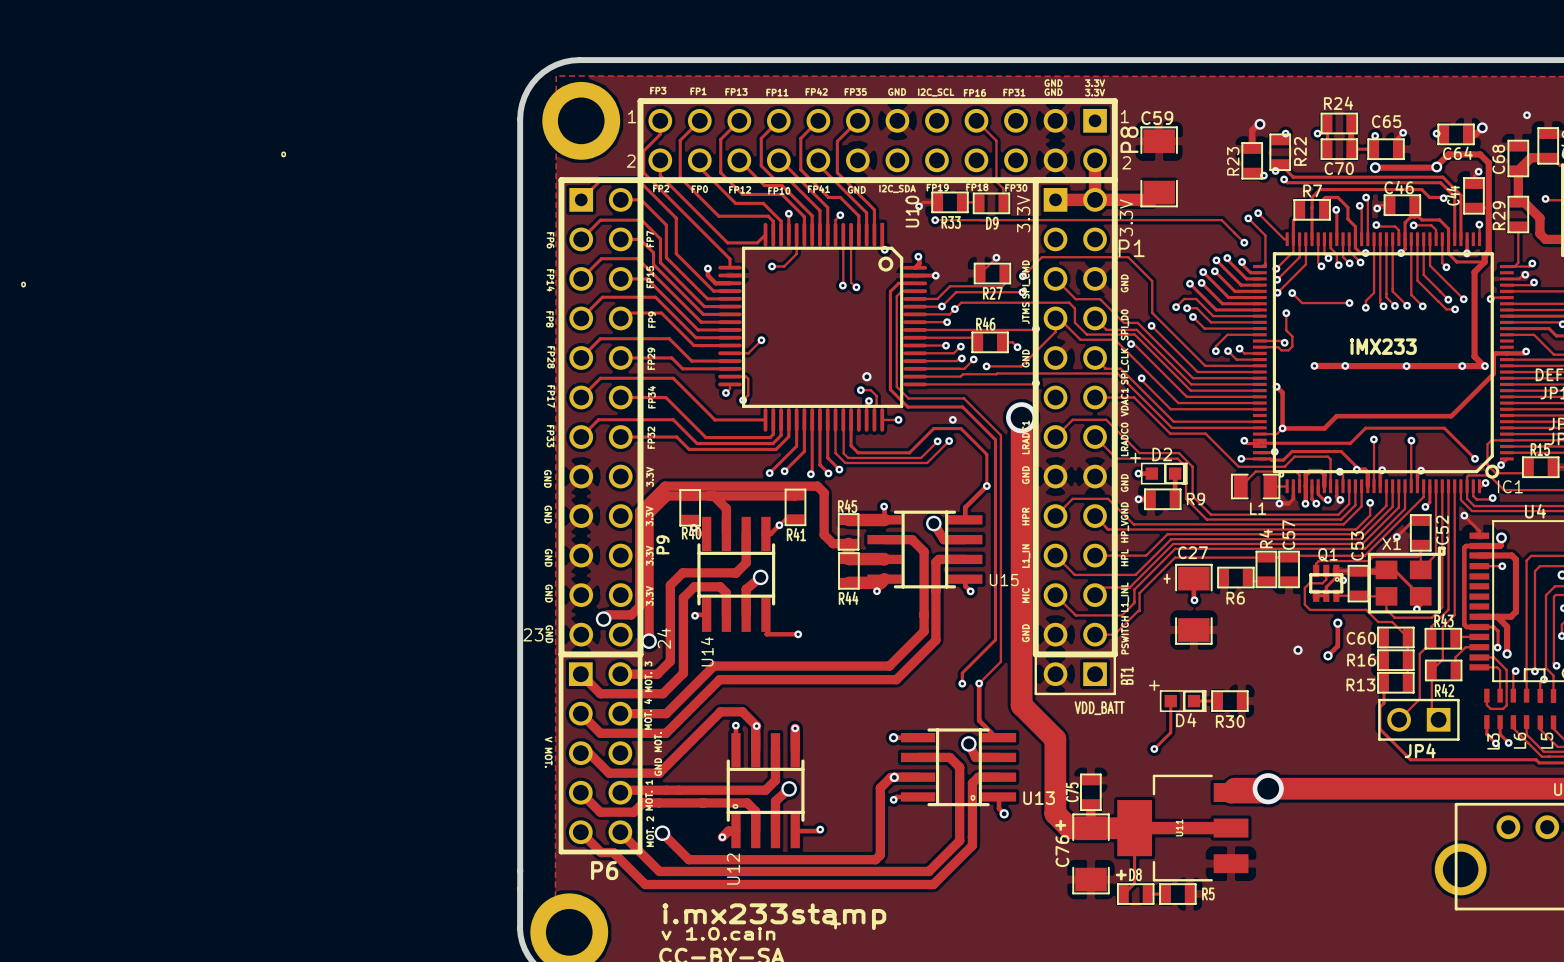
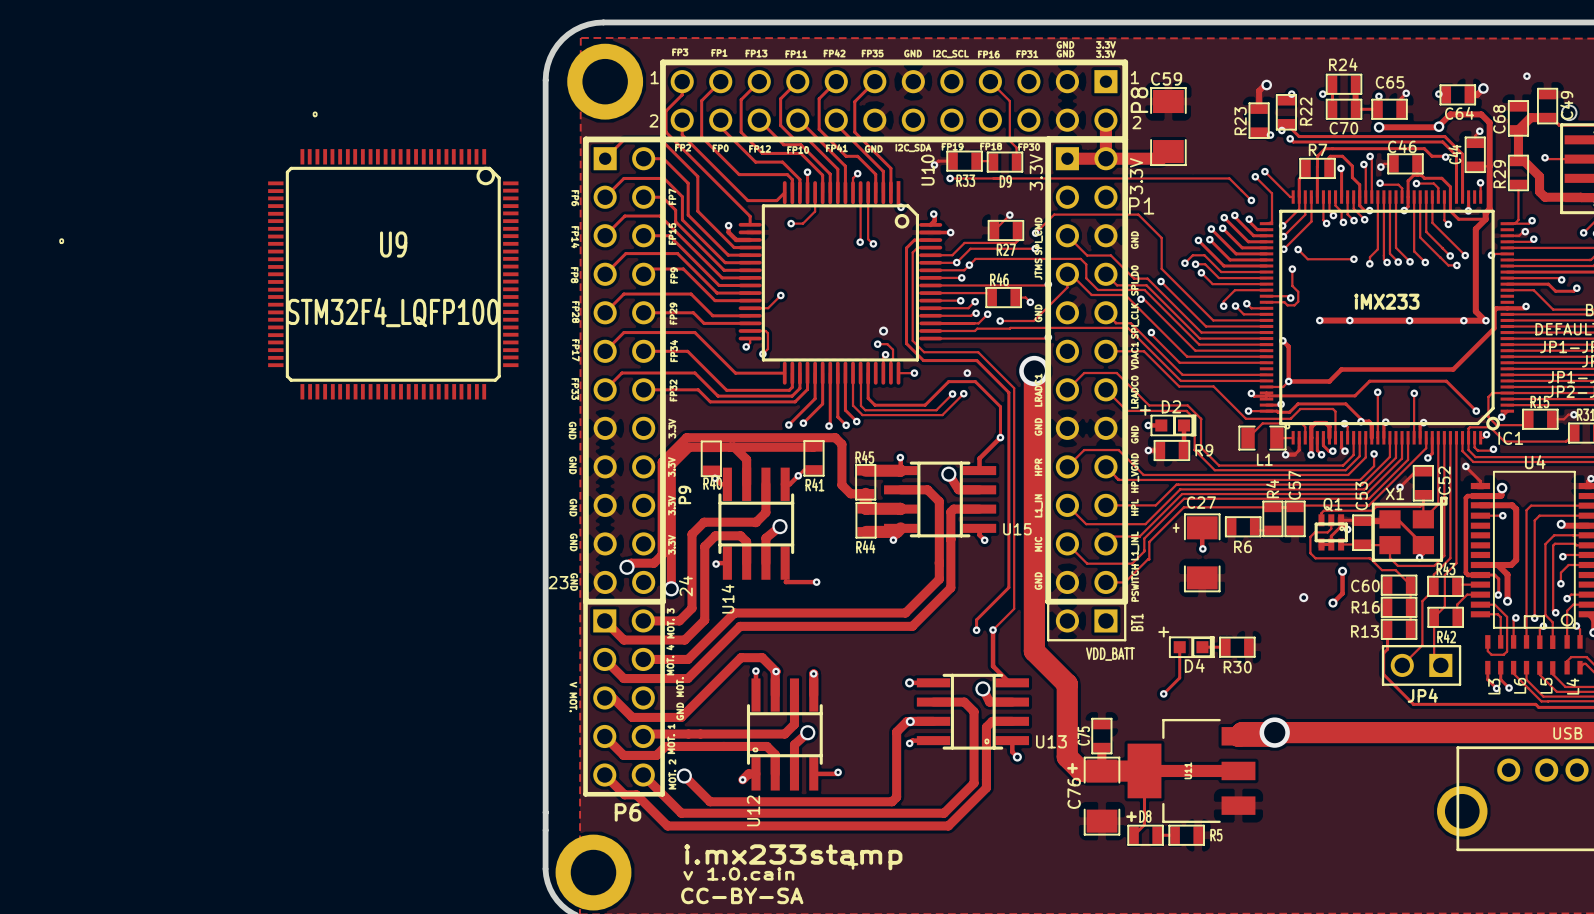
U9: none -> STM32F4_LQFP100 (393, 274)

